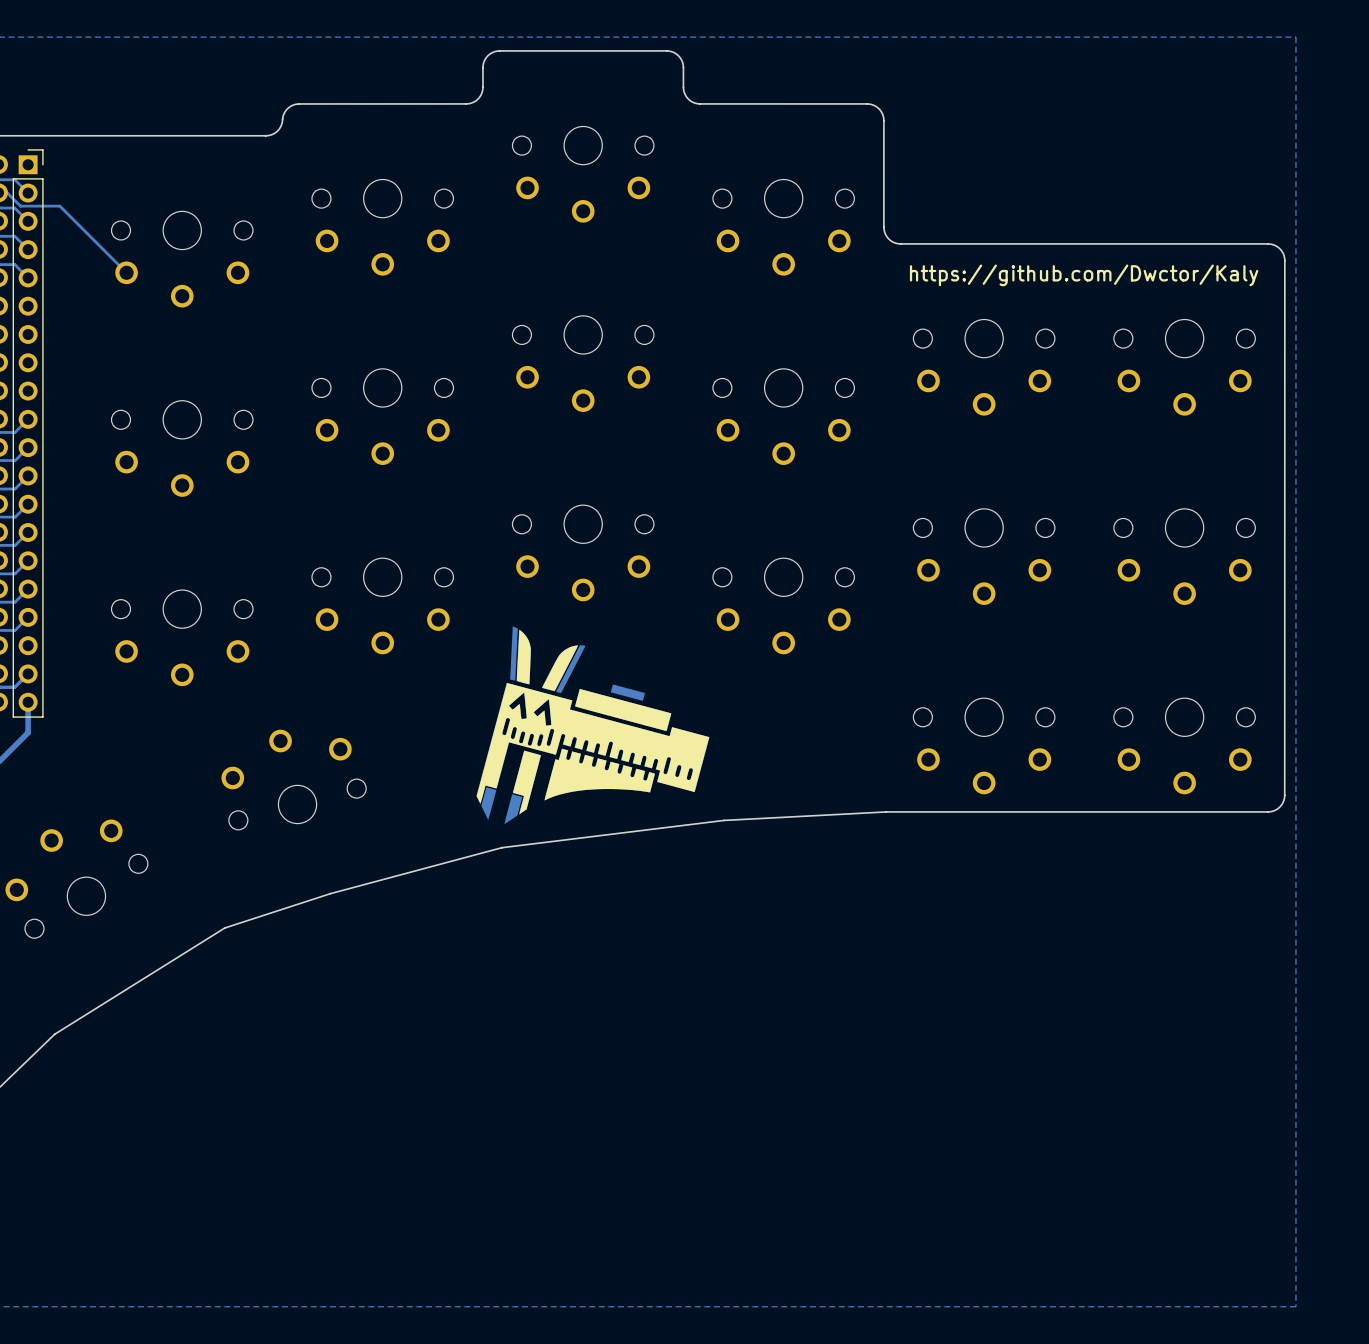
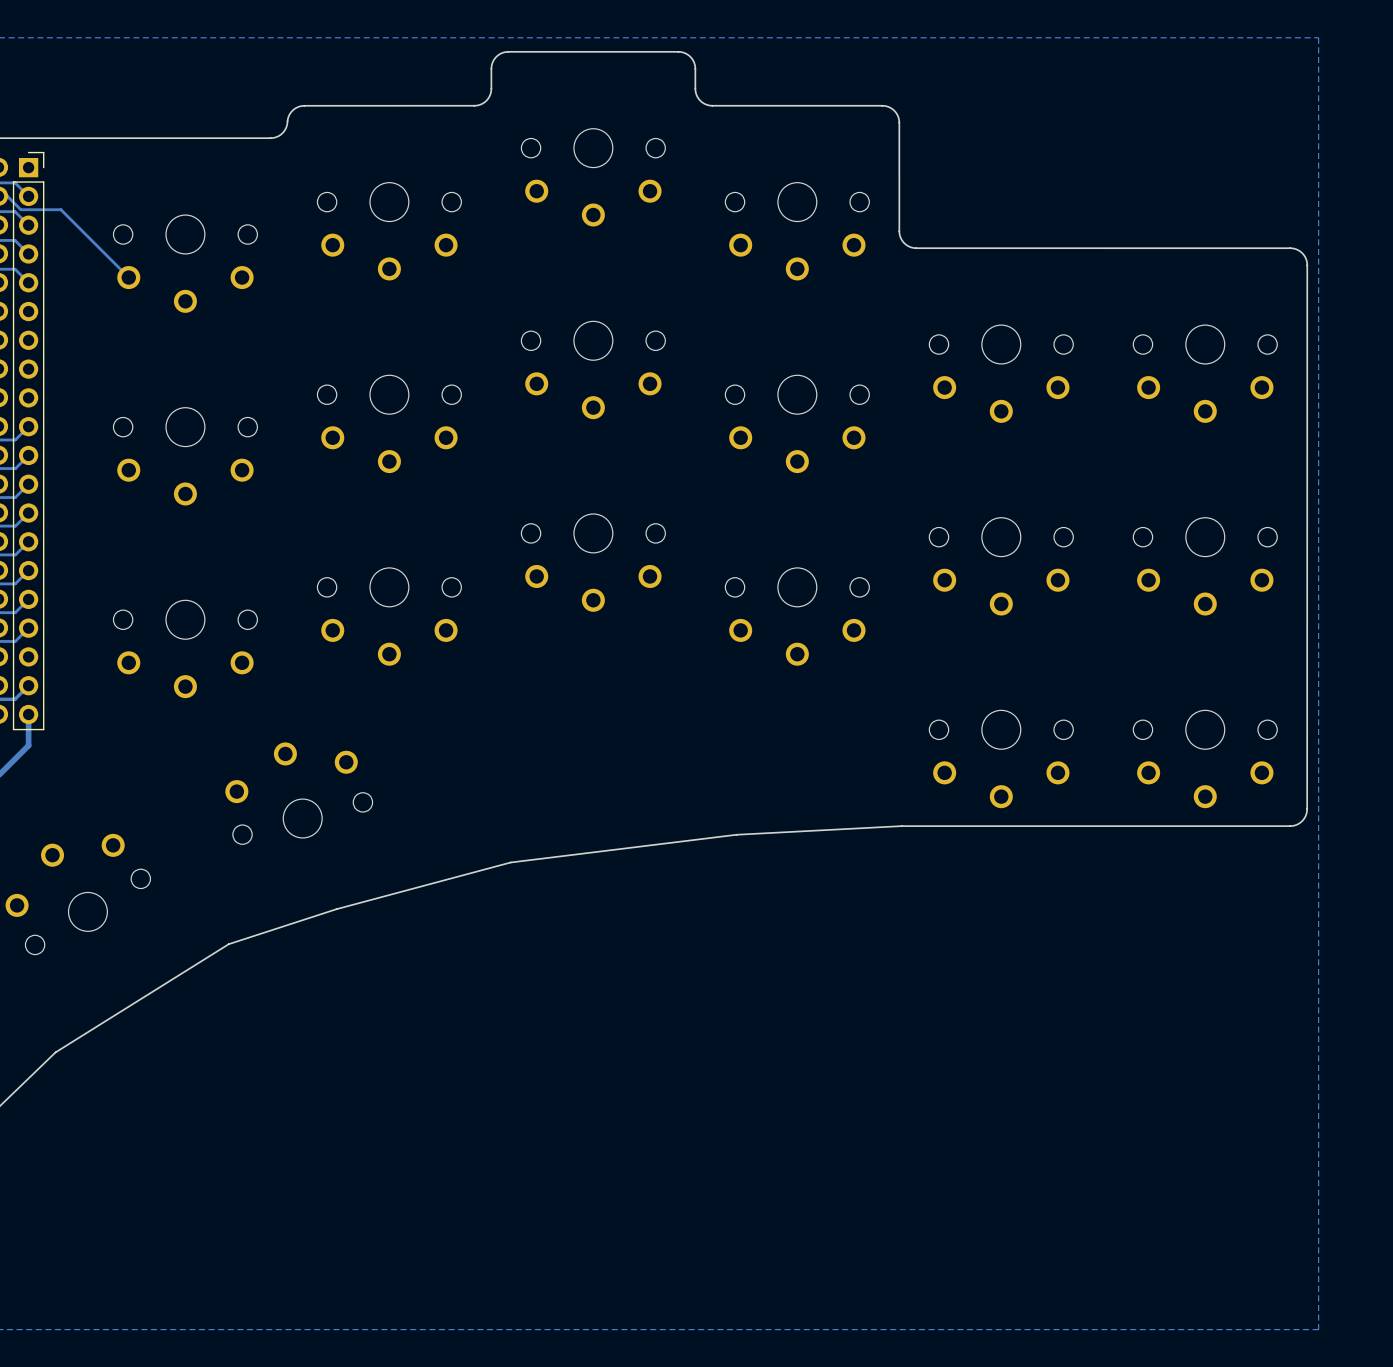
text: https://github.com/Dwctor/Kaly (1084, 275) -> none
drawing: [476, 626, 710, 825] -> none

